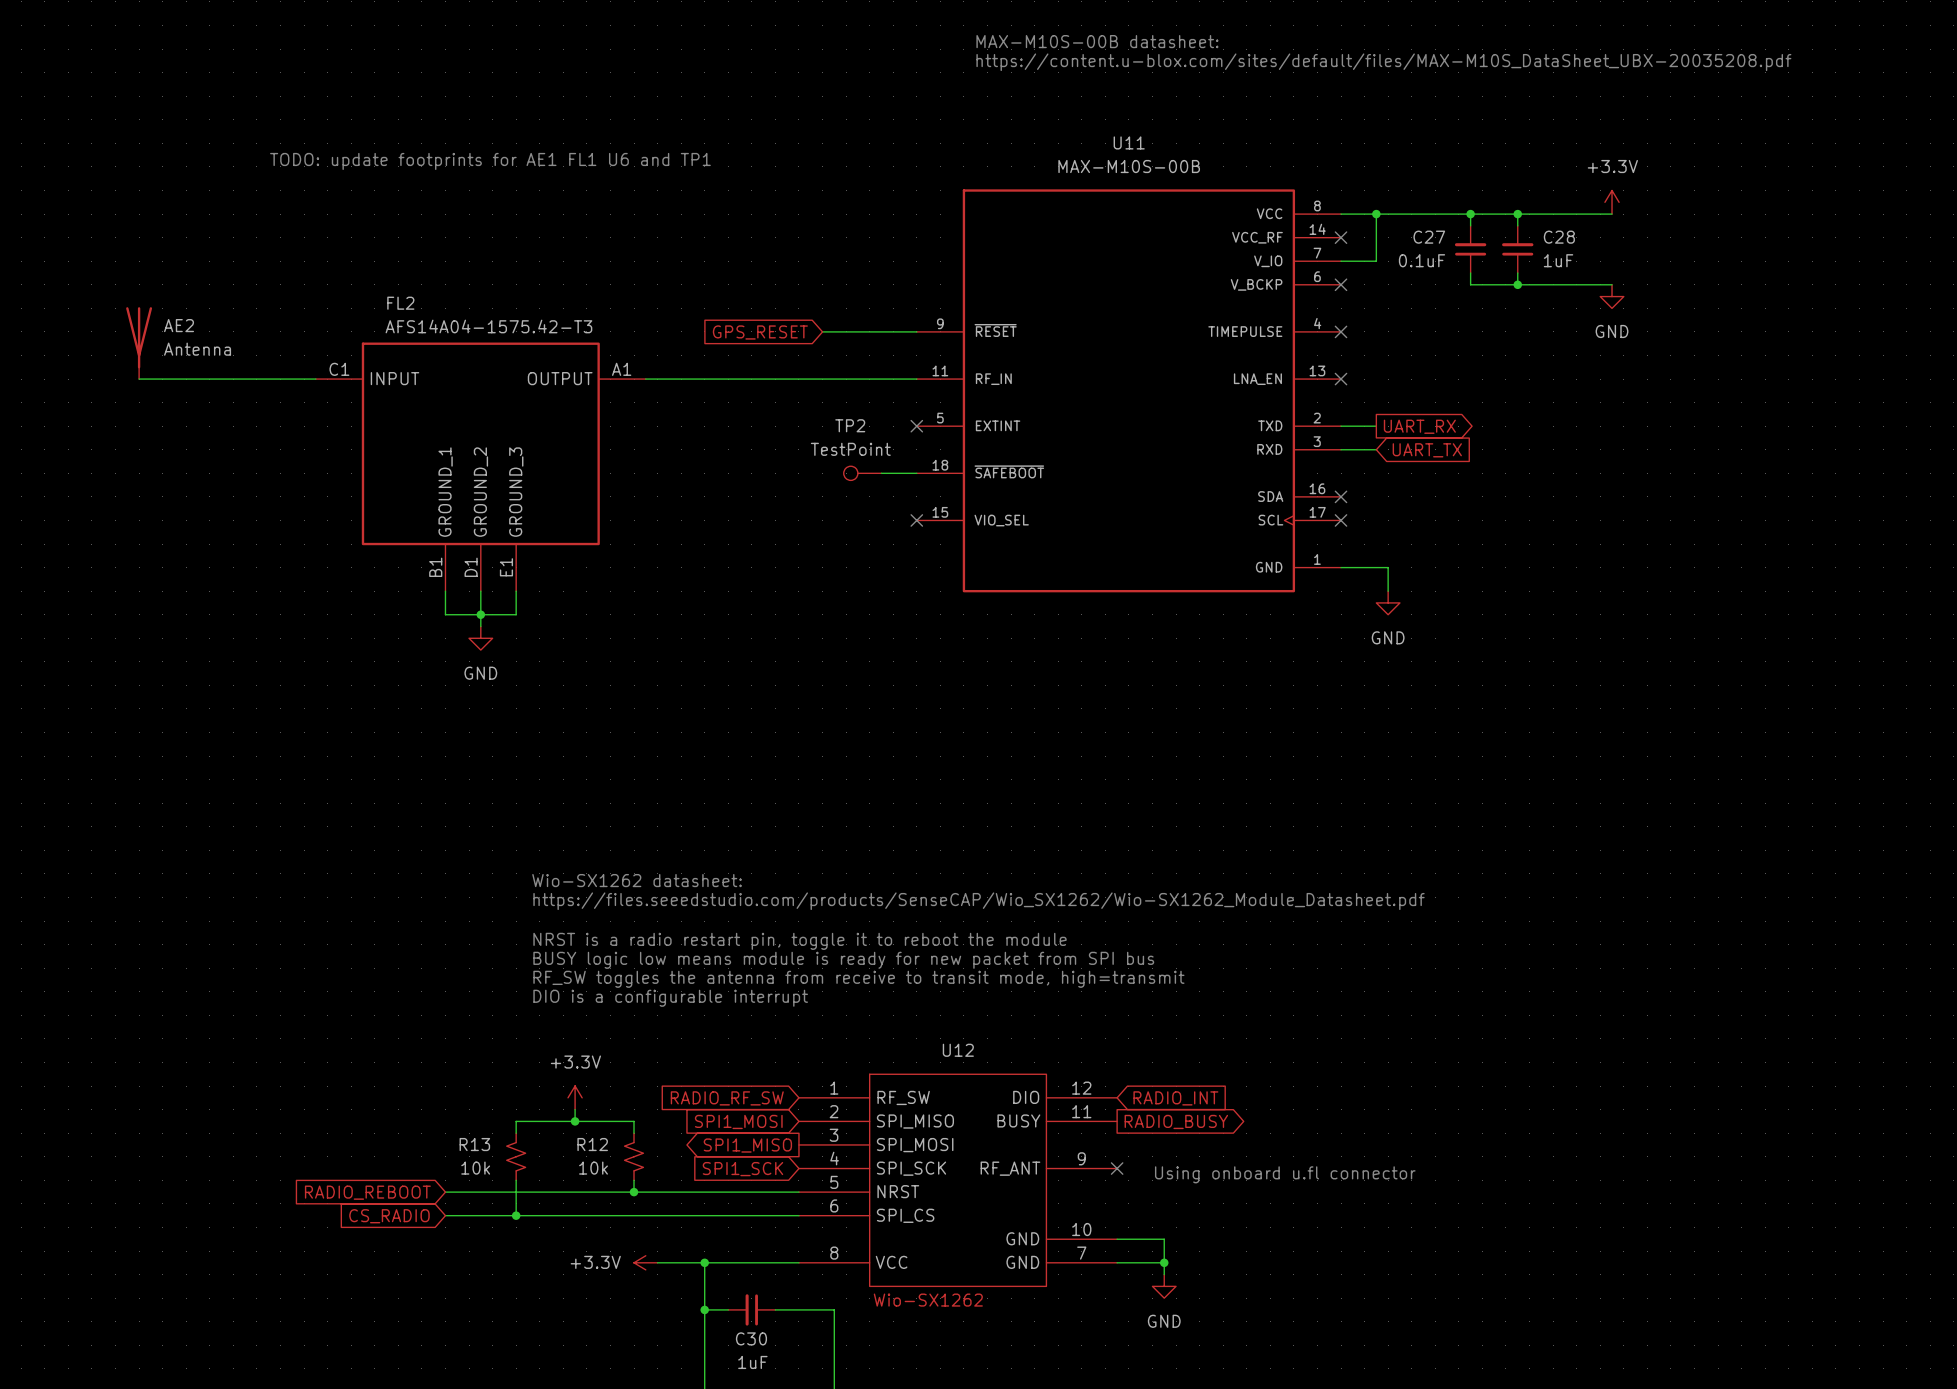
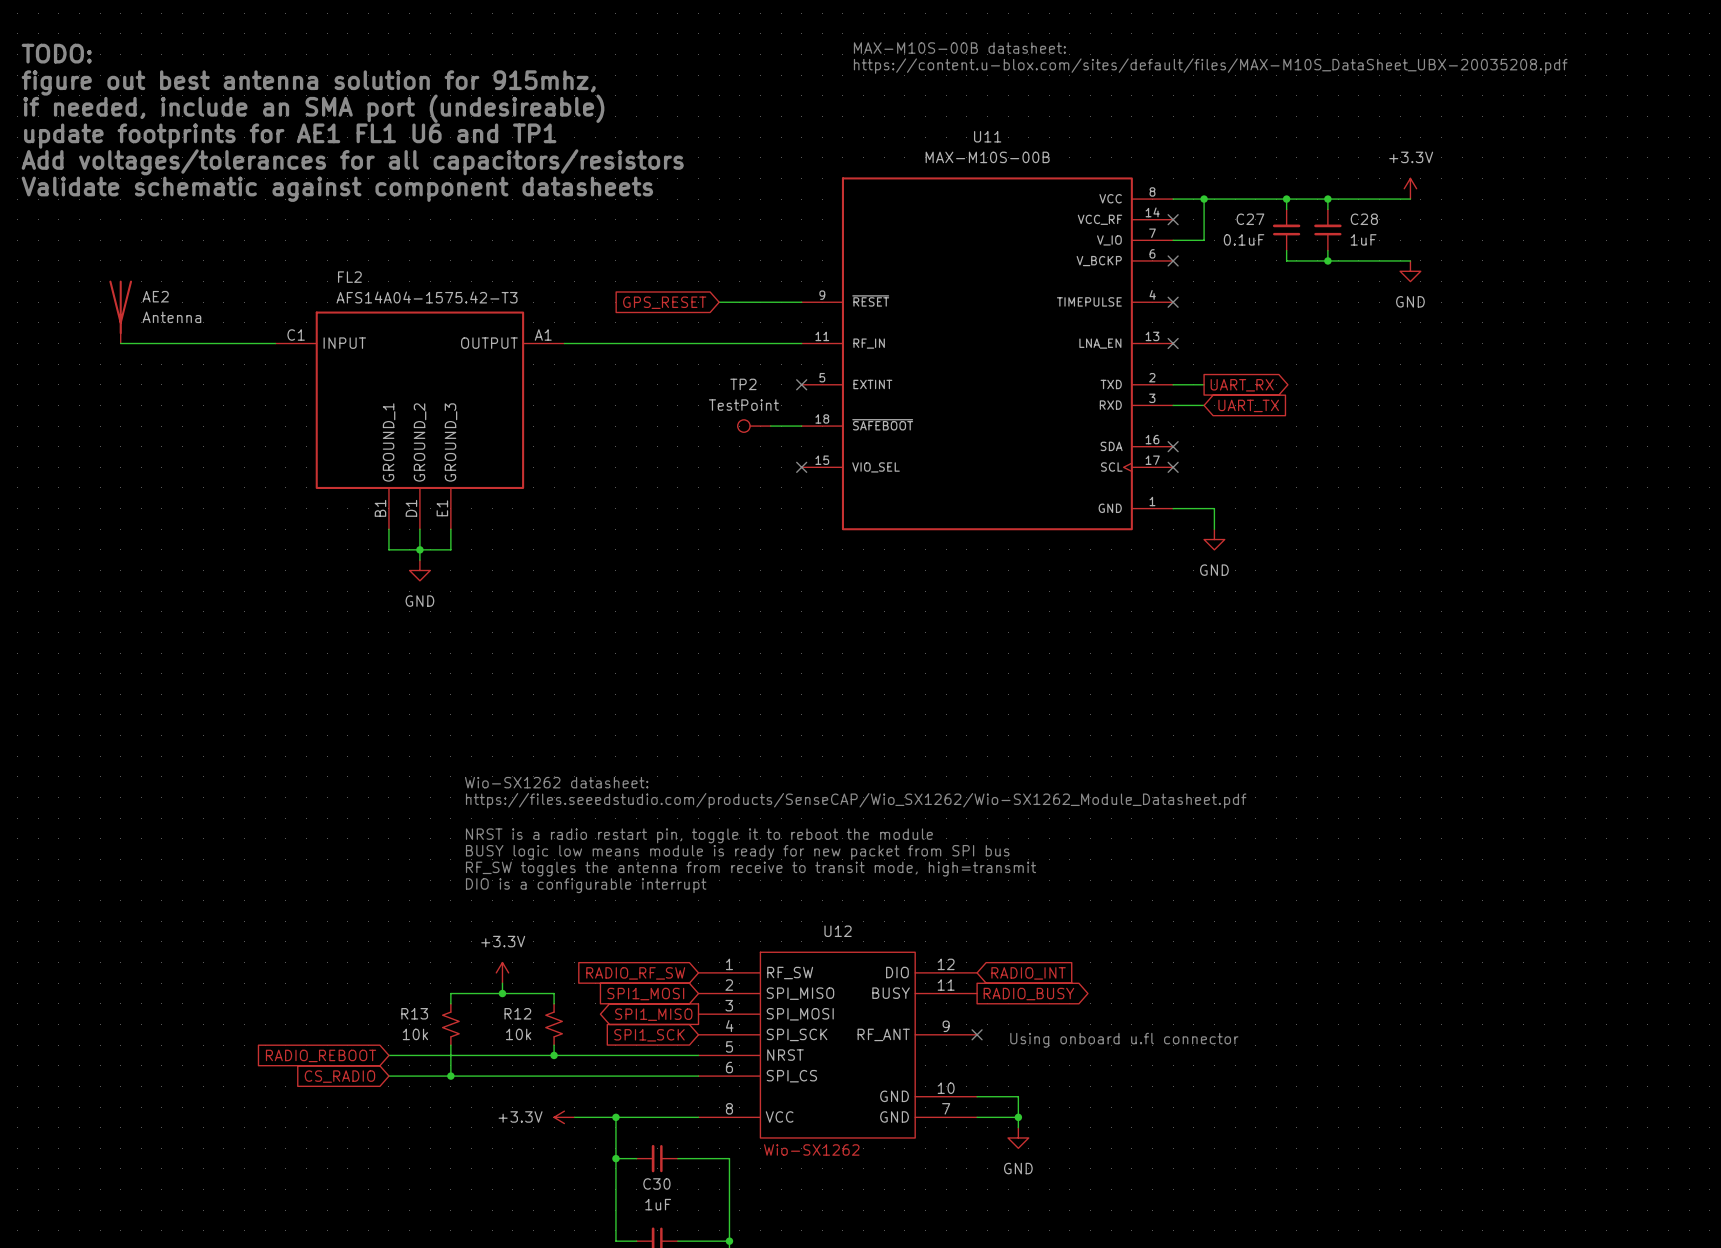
text: none -> TODO: (56, 53)
text: none -> figure out best antenna solution for 915mhz, (308, 82)
text: none -> if needed, include an SMA port (undesireable) (313, 108)
text: none -> update footprints for AE1 FL1 U6 and TP1 (290, 136)
text: TODO: update footprints for AE1 FL1 U6 and TP1 (490, 161) -> none
text: none -> Add voltages/tolerances for all capacitors/resistors (352, 162)
text: none -> Validate schematic against component datasheets (337, 189)

